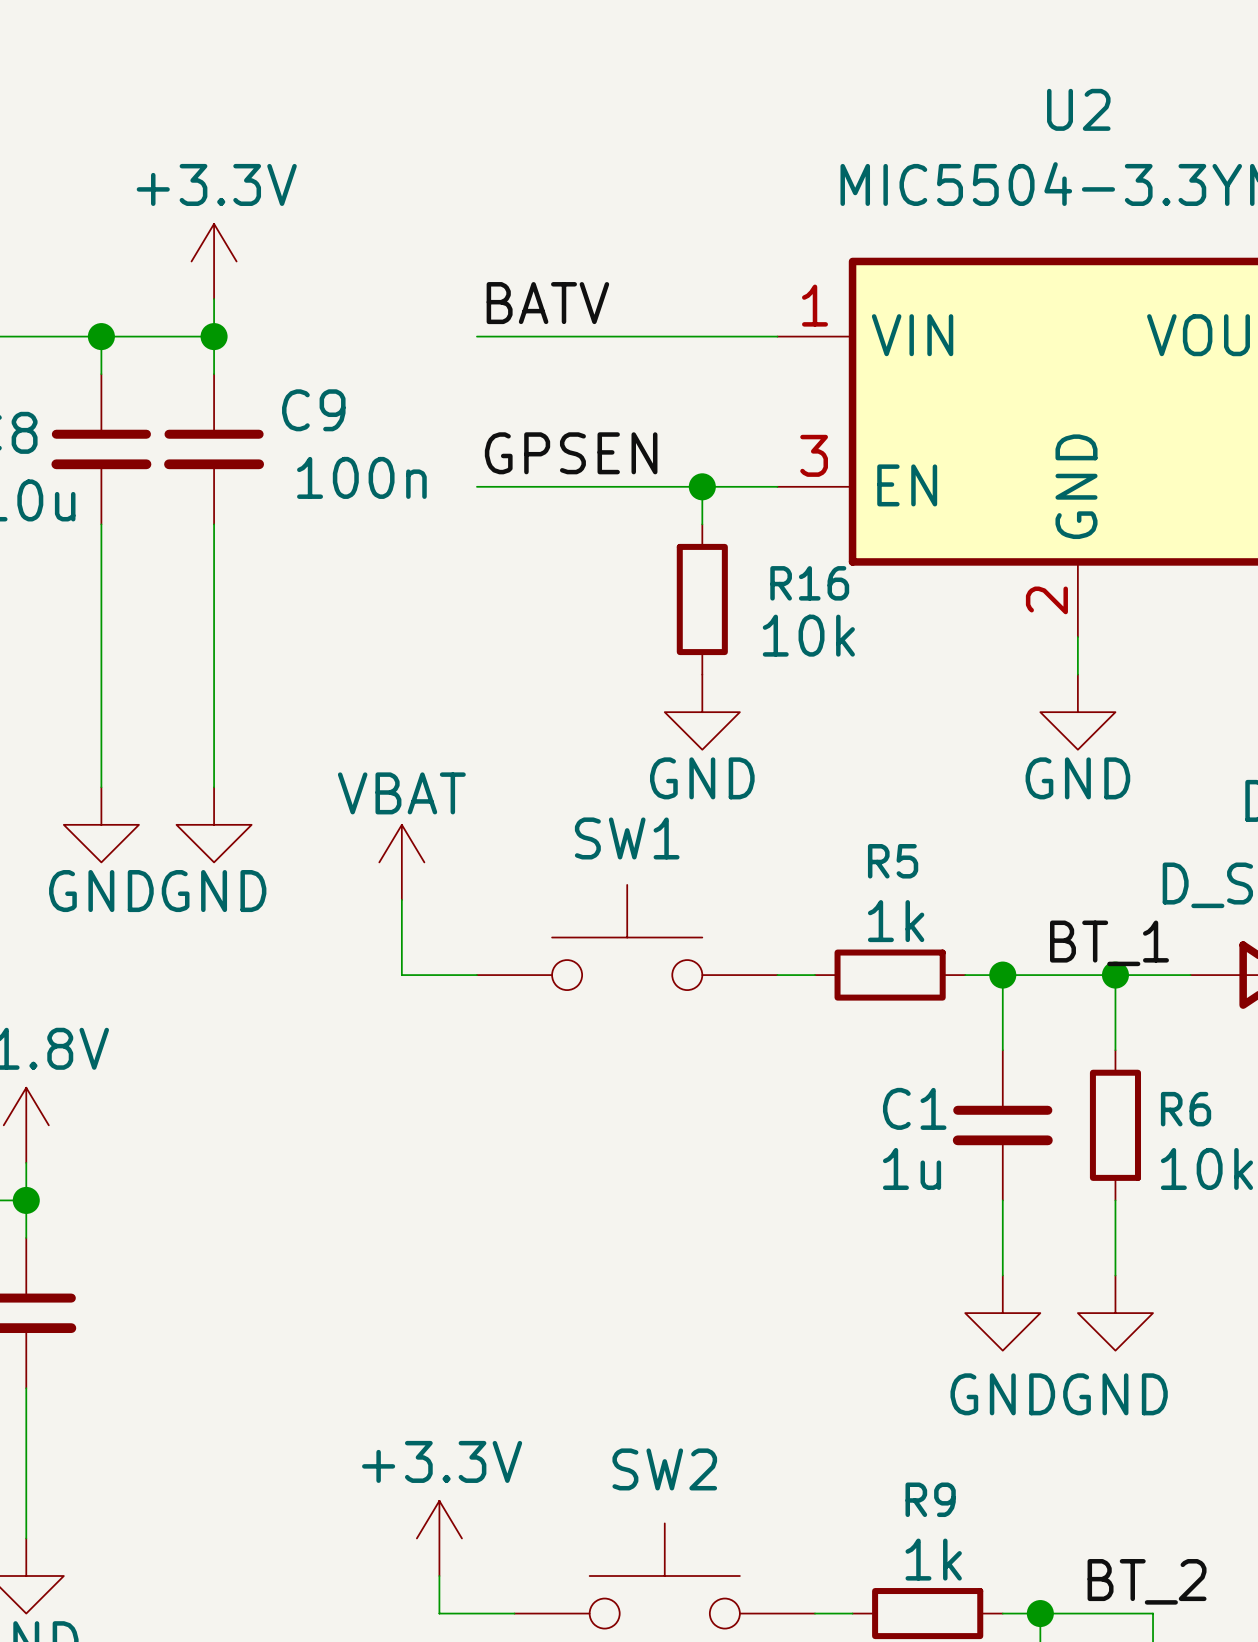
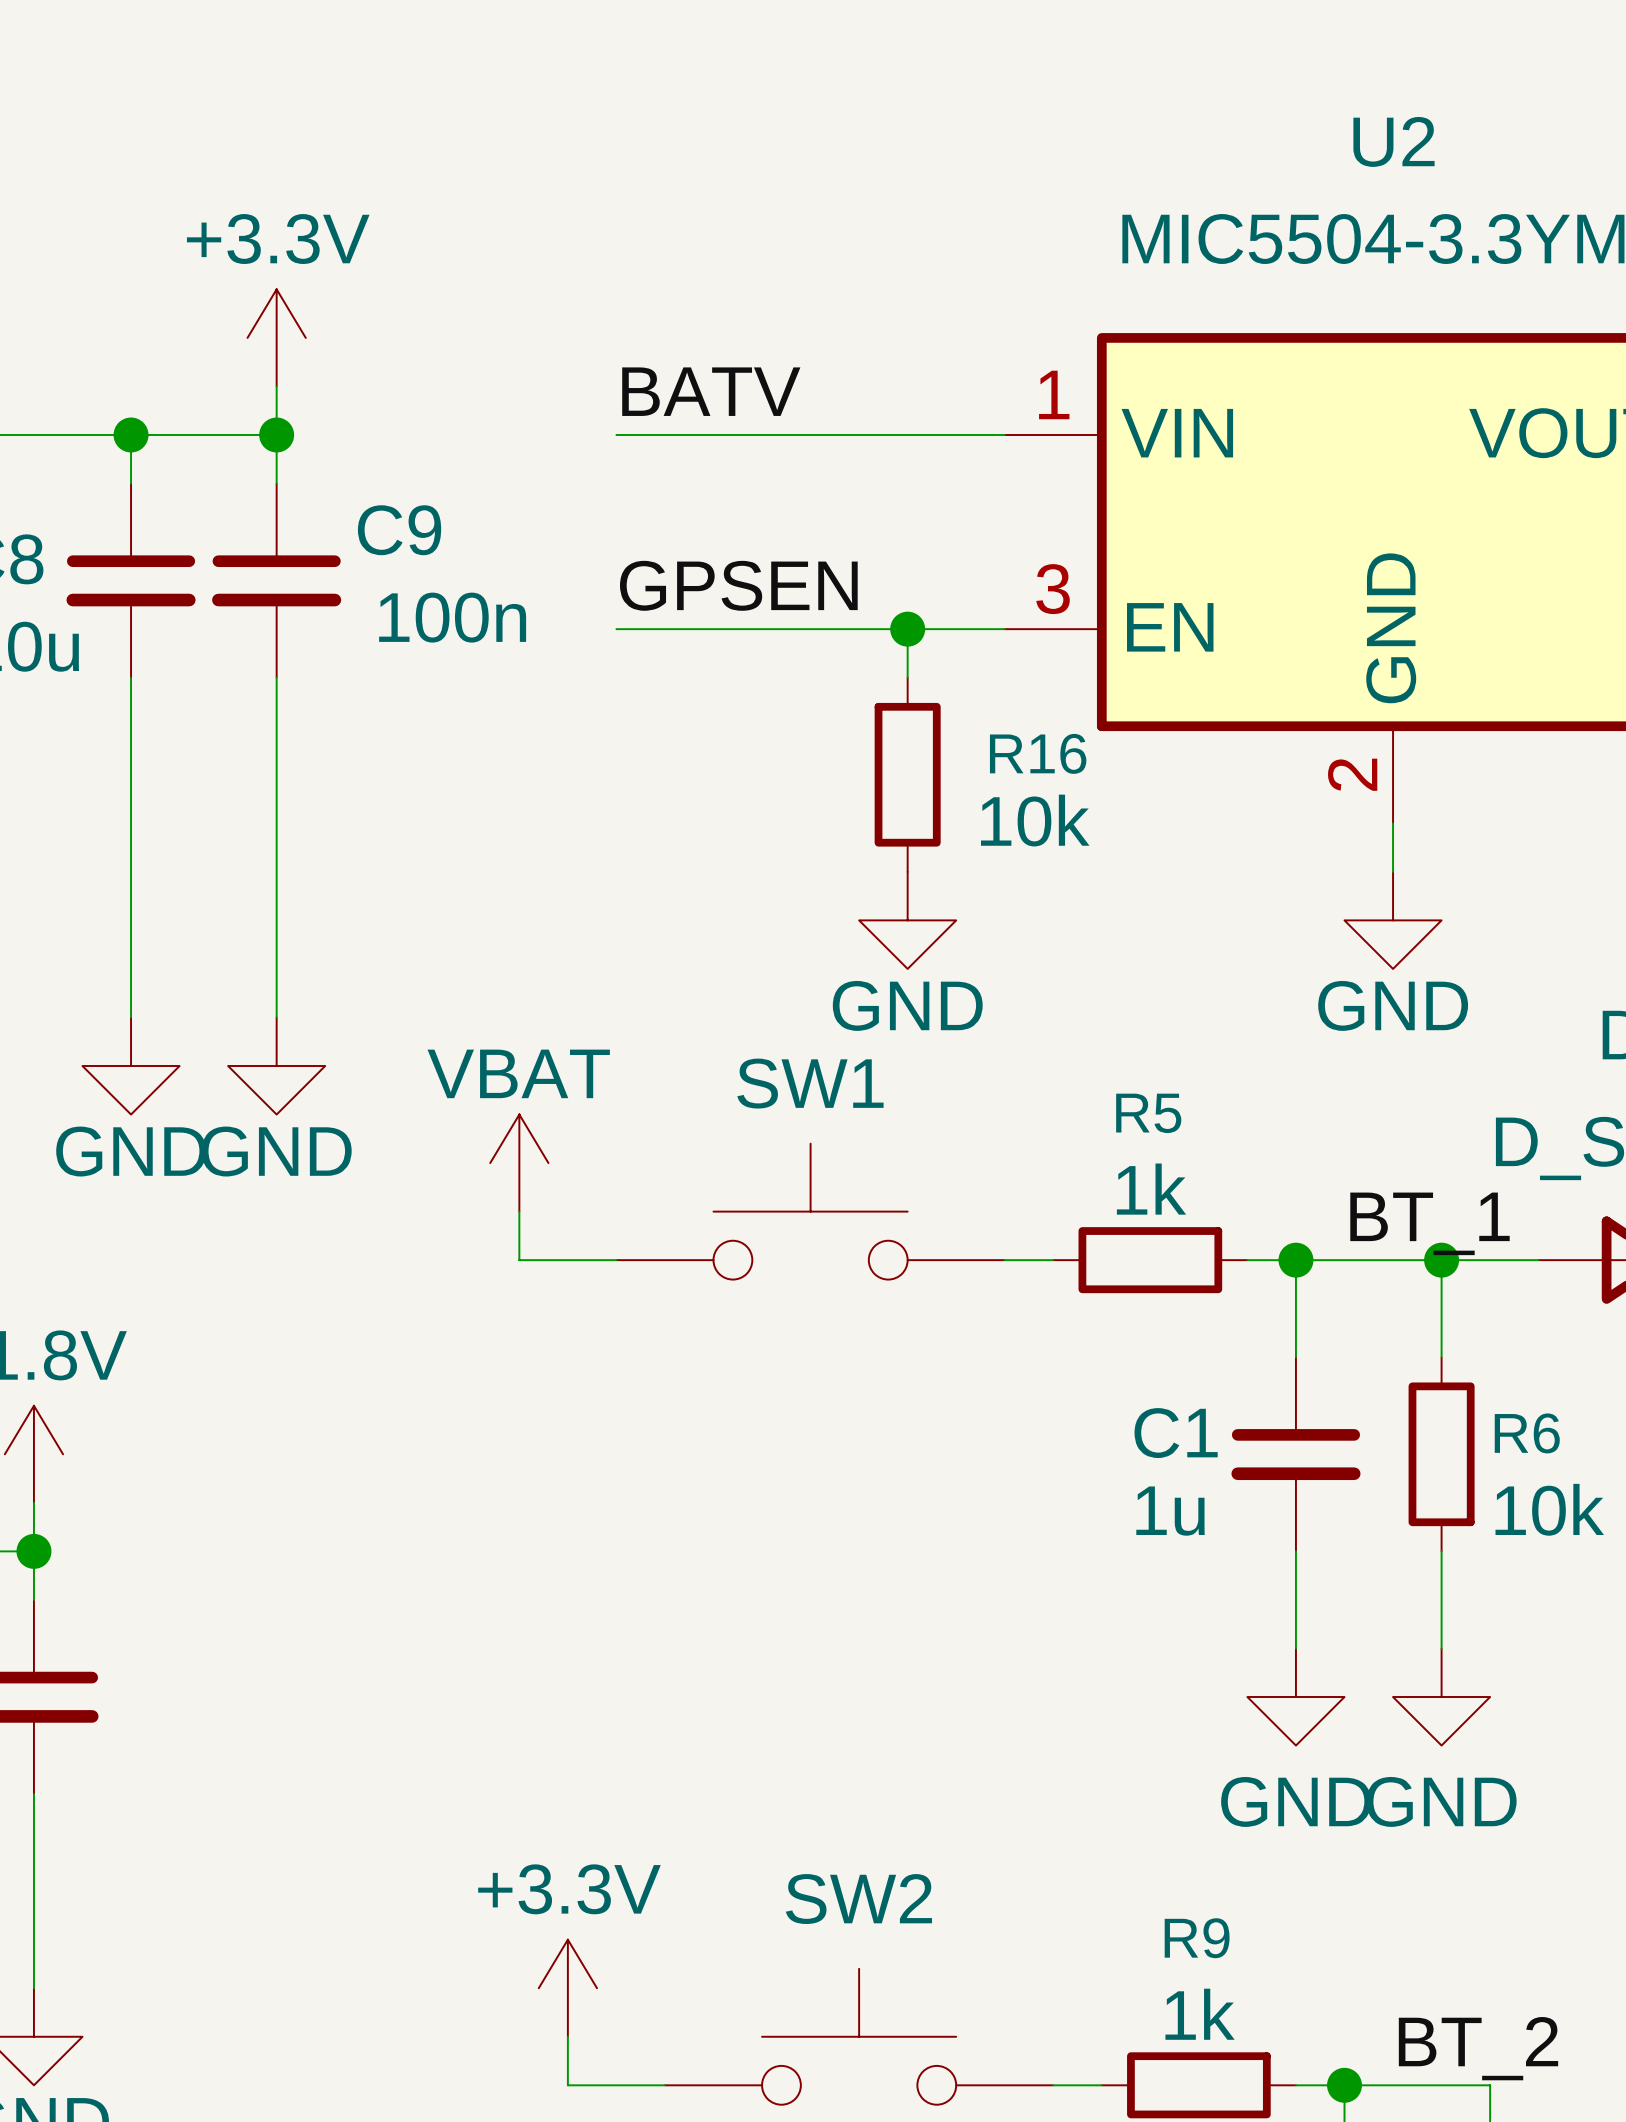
power symbol position: VBAT (401, 862) -> VBAT (519, 1163)

